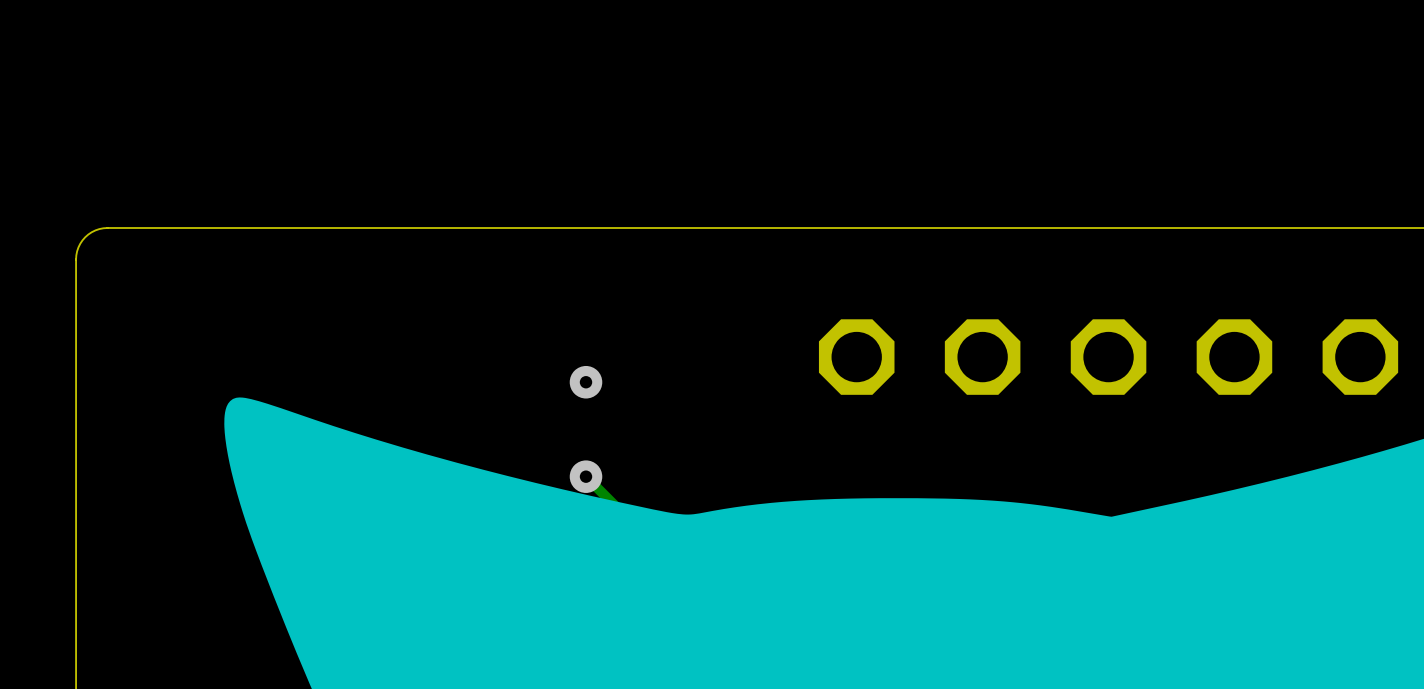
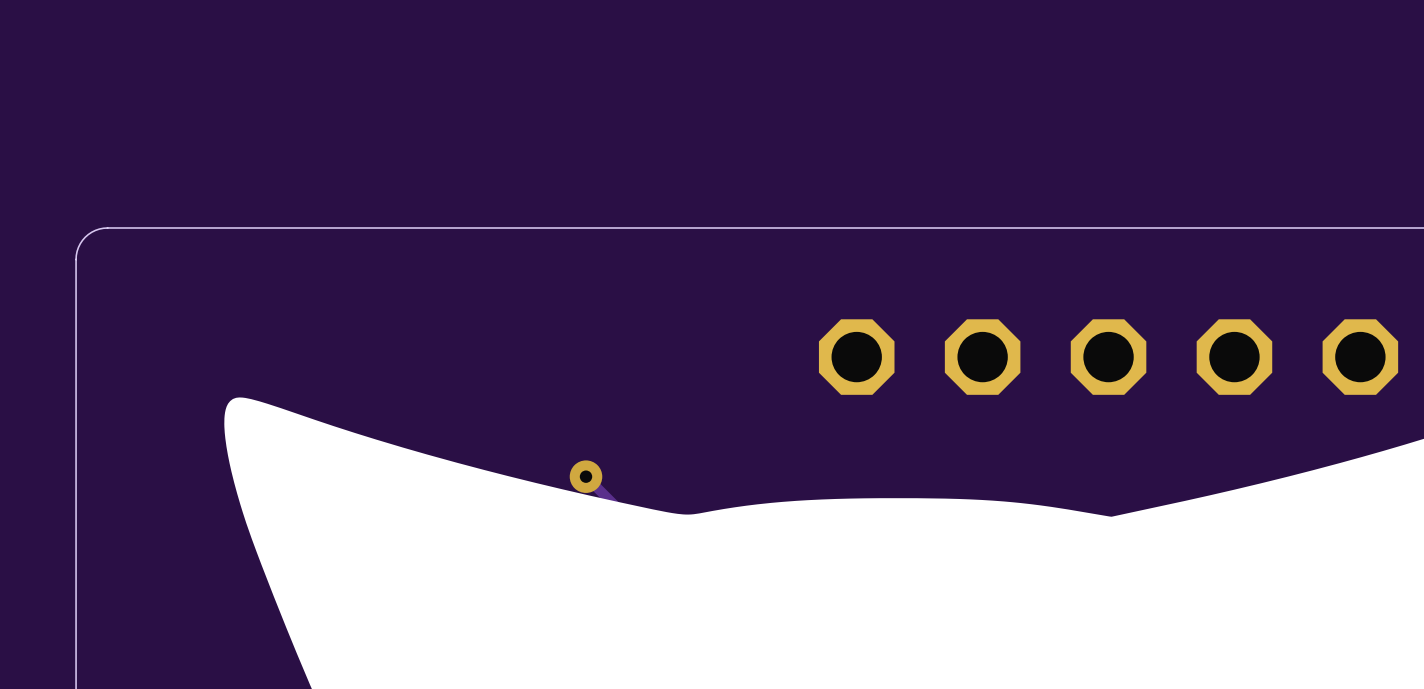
via: (586, 382) -> none

